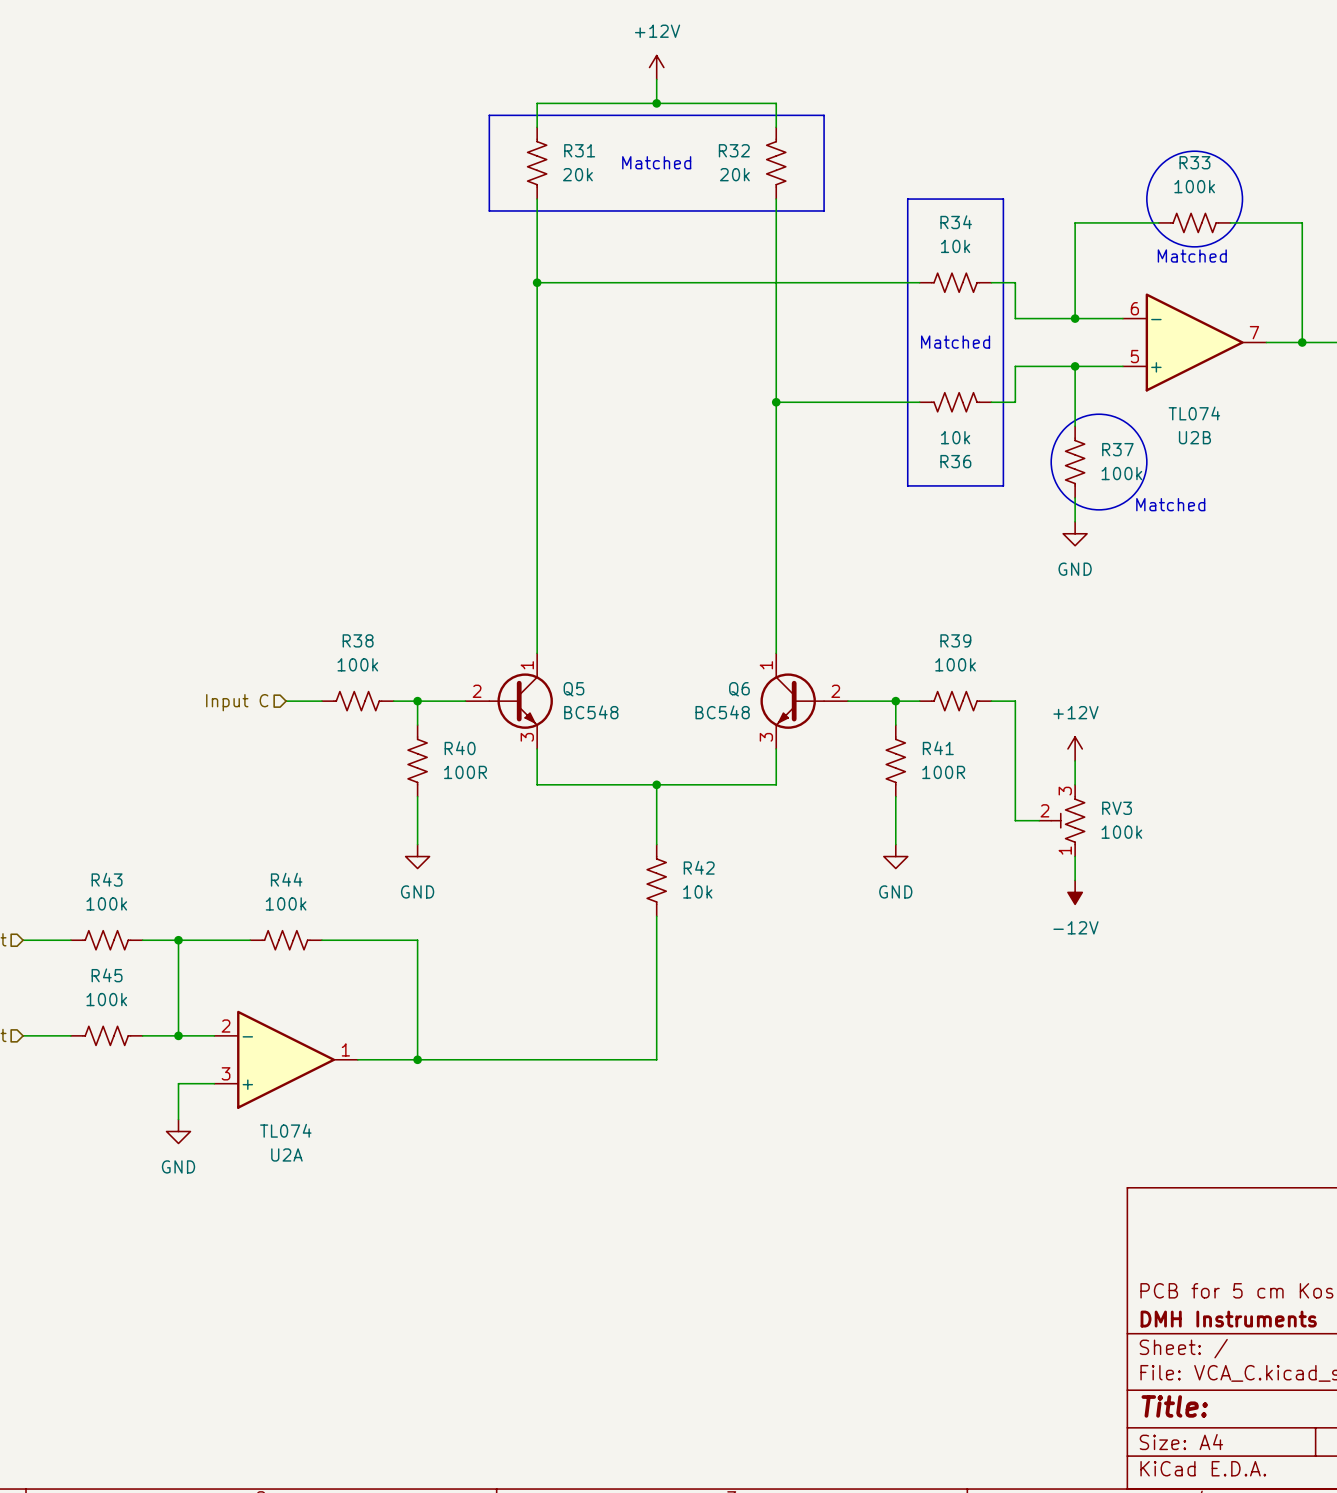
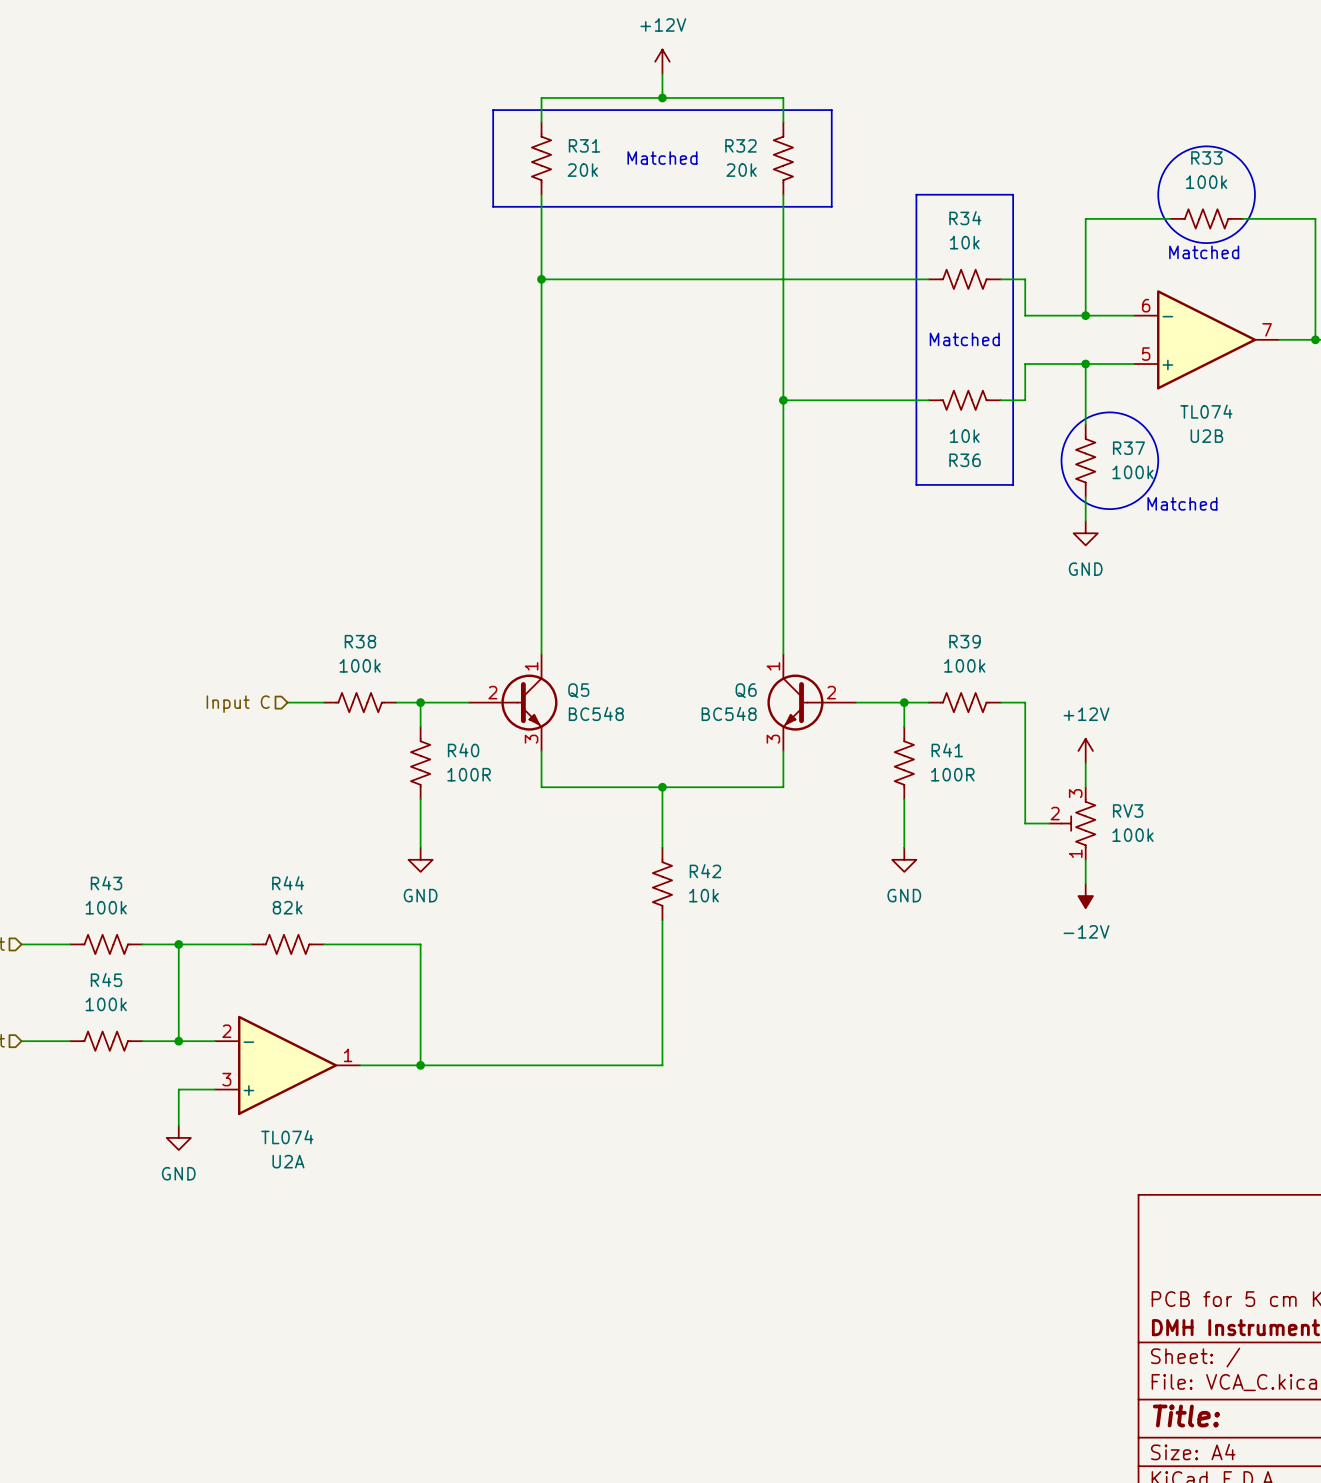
Q5 symbol: [465, 653, 553, 749] -> [468, 654, 558, 751]
Q6 symbol: [760, 653, 848, 749] -> [767, 654, 856, 751]
R44 value: 100k (286, 903) -> 82k (287, 907)

